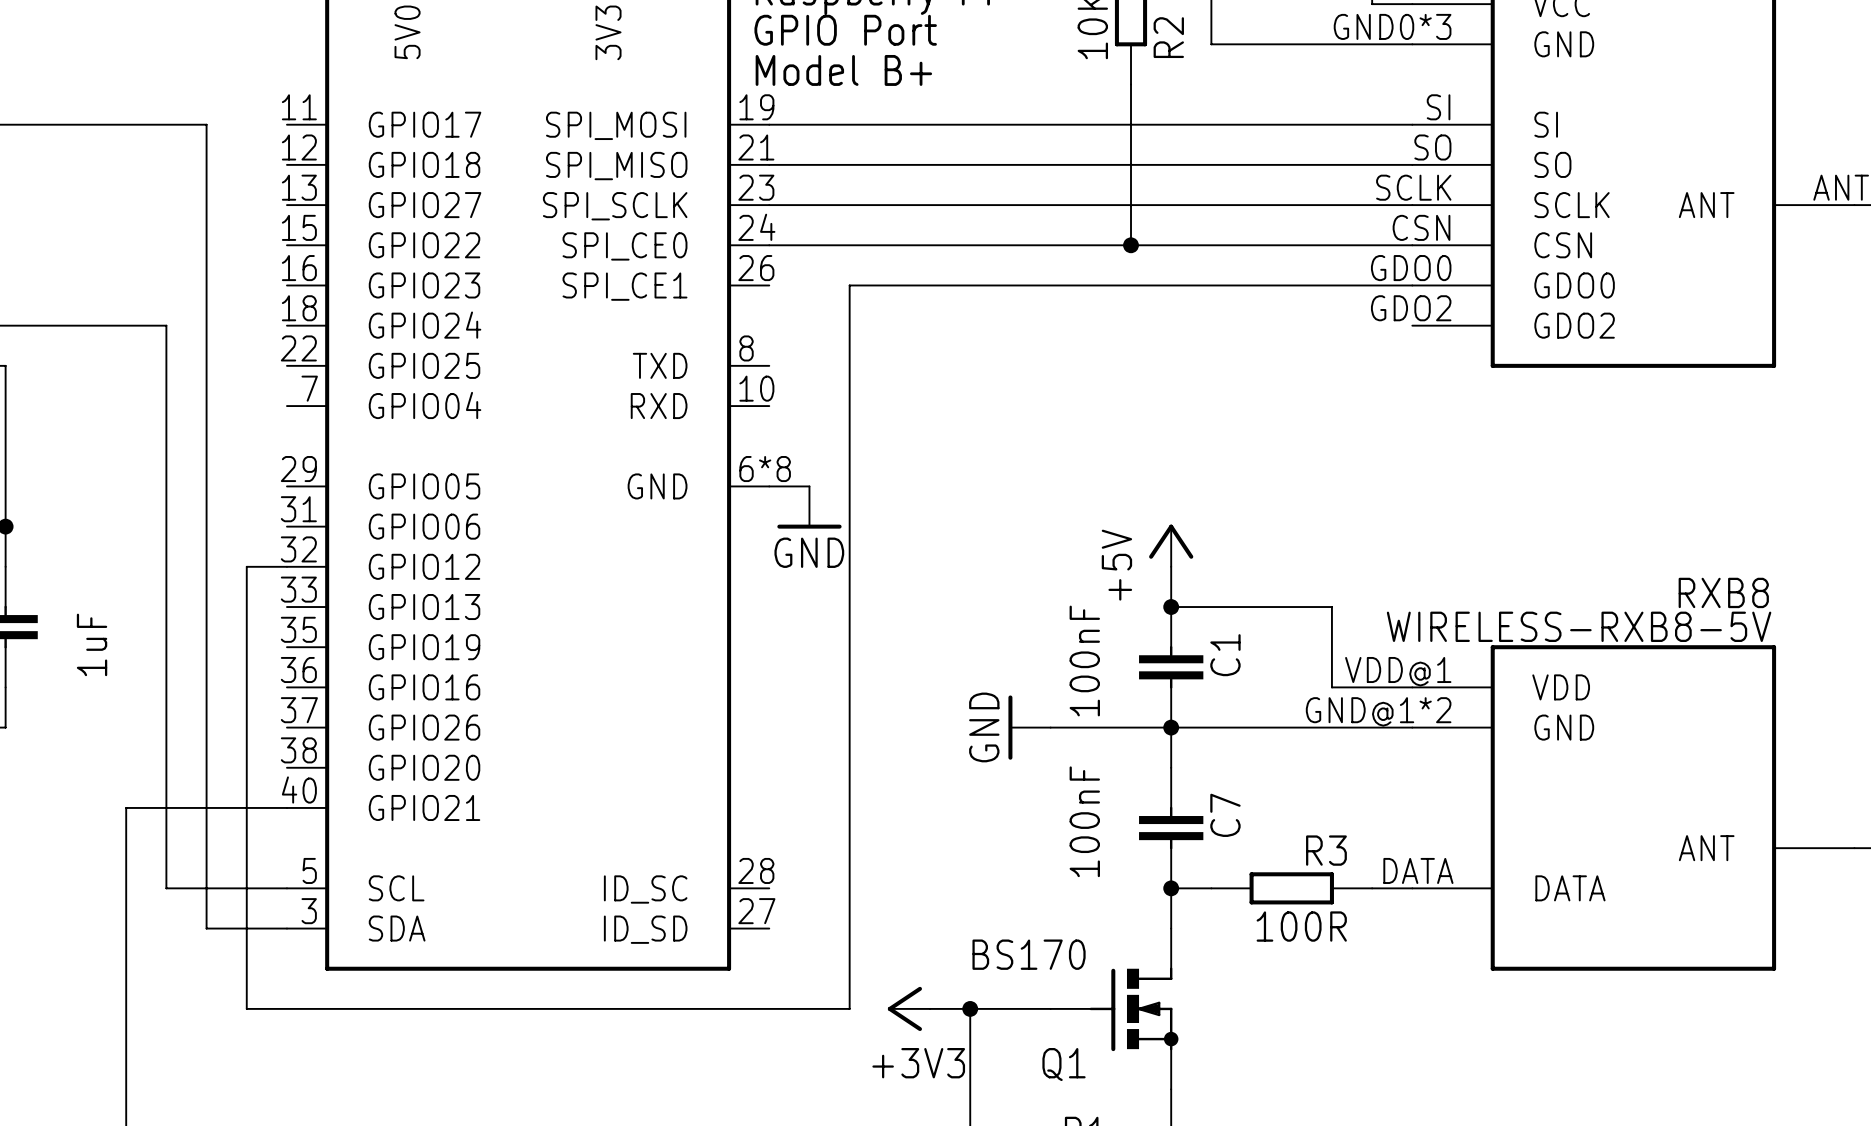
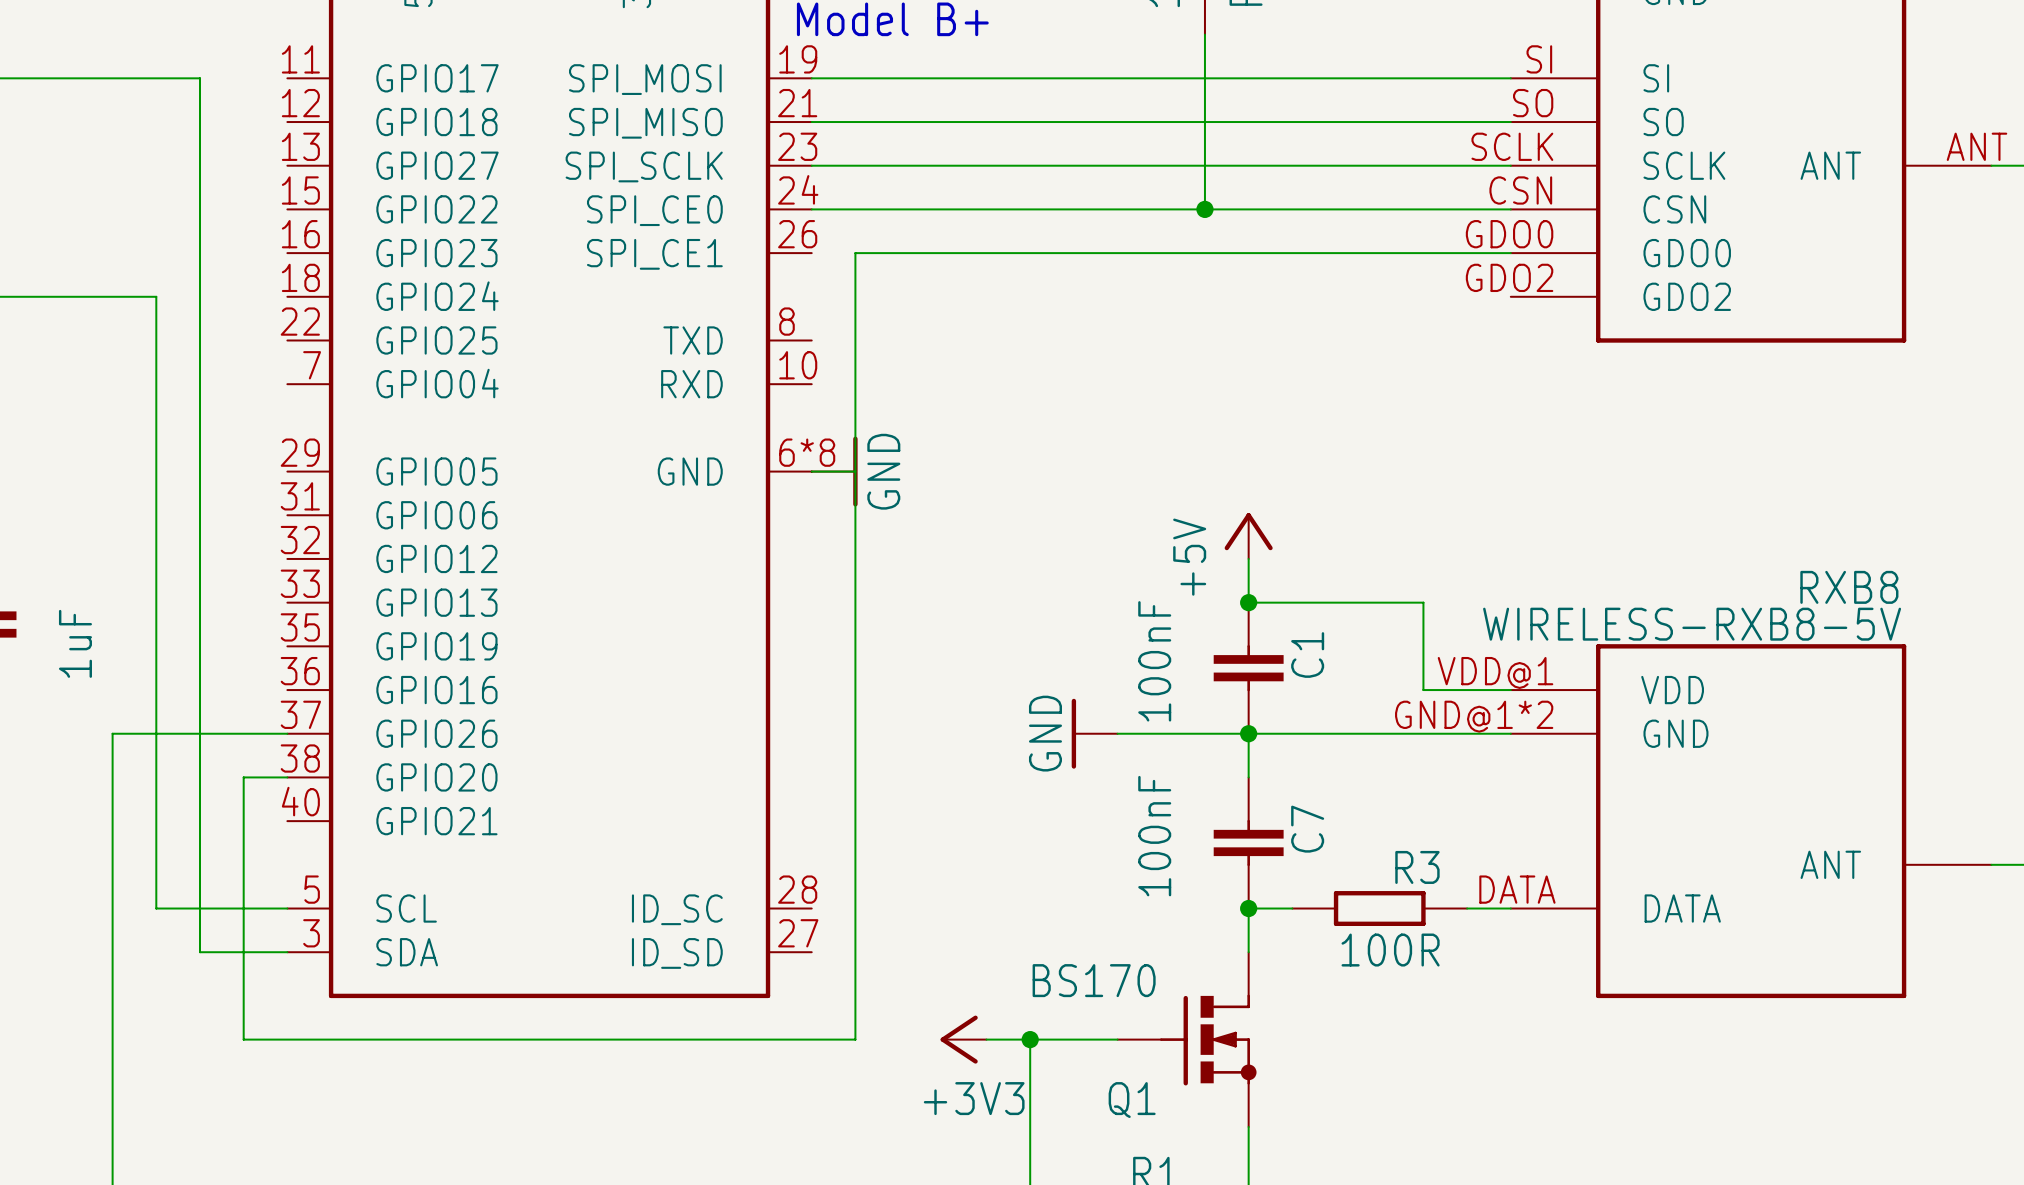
wire: (849, 285) (849, 1008) (809, 1008) -> (899, 253) (855, 253) (855, 1039)
power symbol rotation: 0° (809, 526) -> 90° counterclockwise (855, 471)
wire: (286, 566) (246, 566) (246, 767) -> (287, 777) (243, 777)
wire: (126, 807) (286, 807) -> (112, 821) (112, 733) (287, 733)

